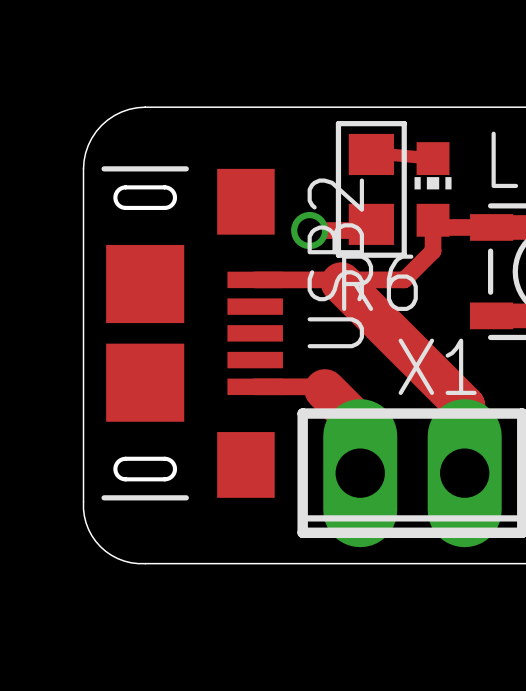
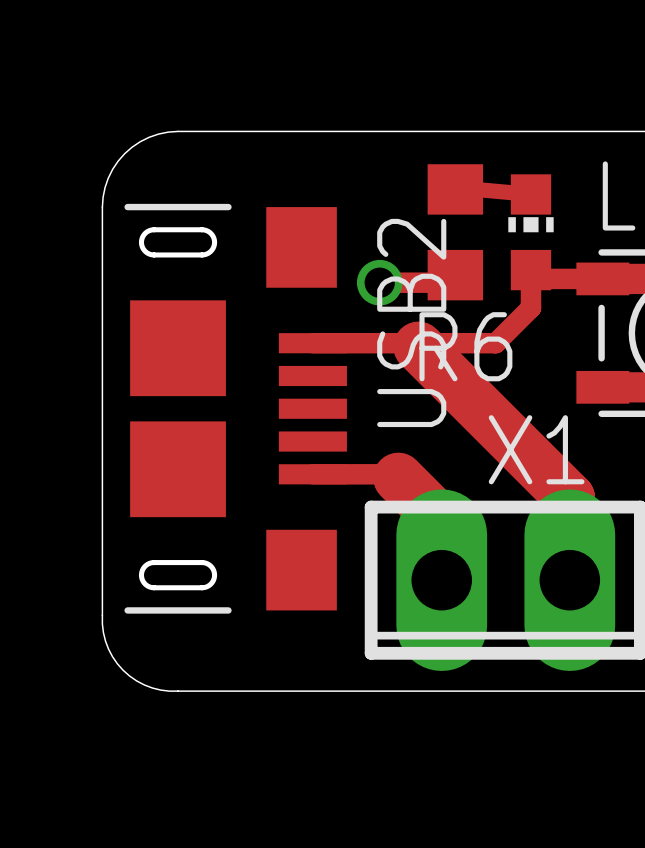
R6 footprint: [335, 121, 407, 258] -> [427, 164, 484, 301]

